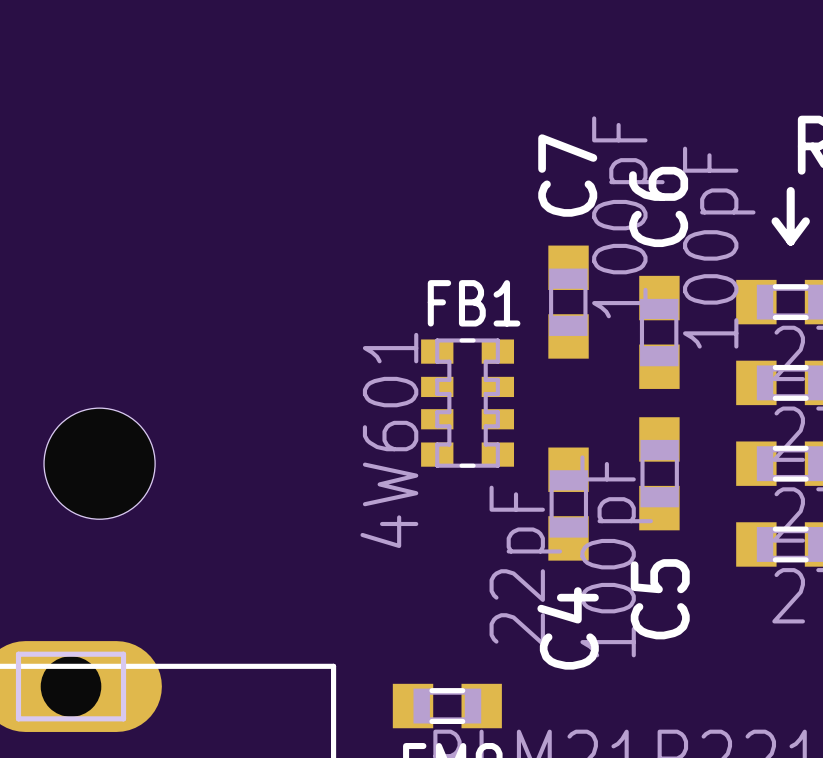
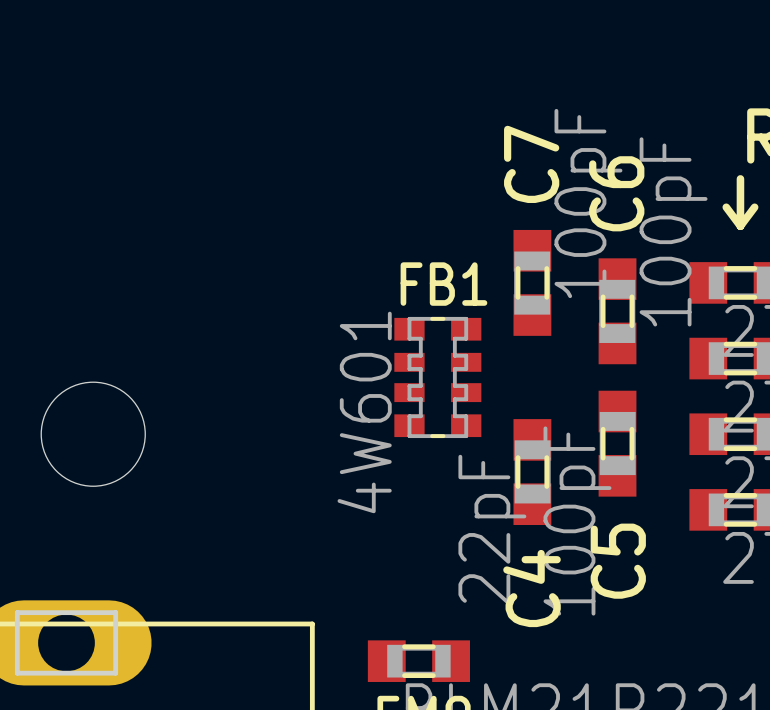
C7 footprint: [548, 245, 589, 359] -> [513, 229, 552, 336]
C6 footprint: [639, 275, 680, 389] -> [598, 258, 637, 365]
C5 footprint: [639, 417, 680, 531] -> [598, 390, 637, 497]
C4 footprint: [548, 447, 589, 561] -> [513, 419, 552, 526]

